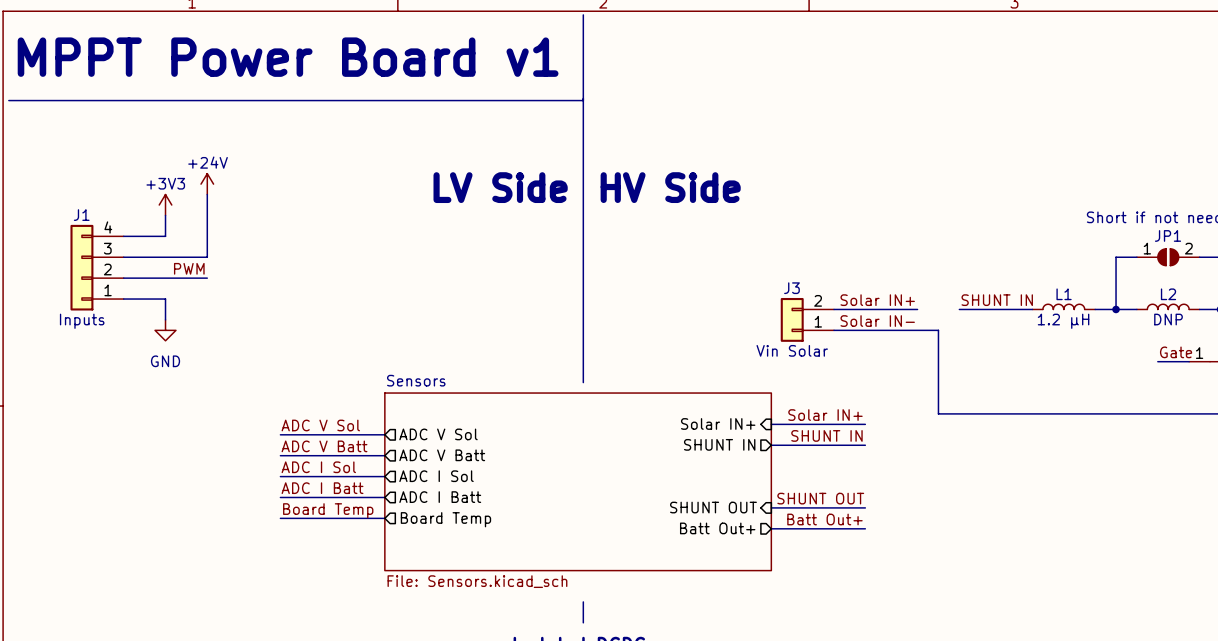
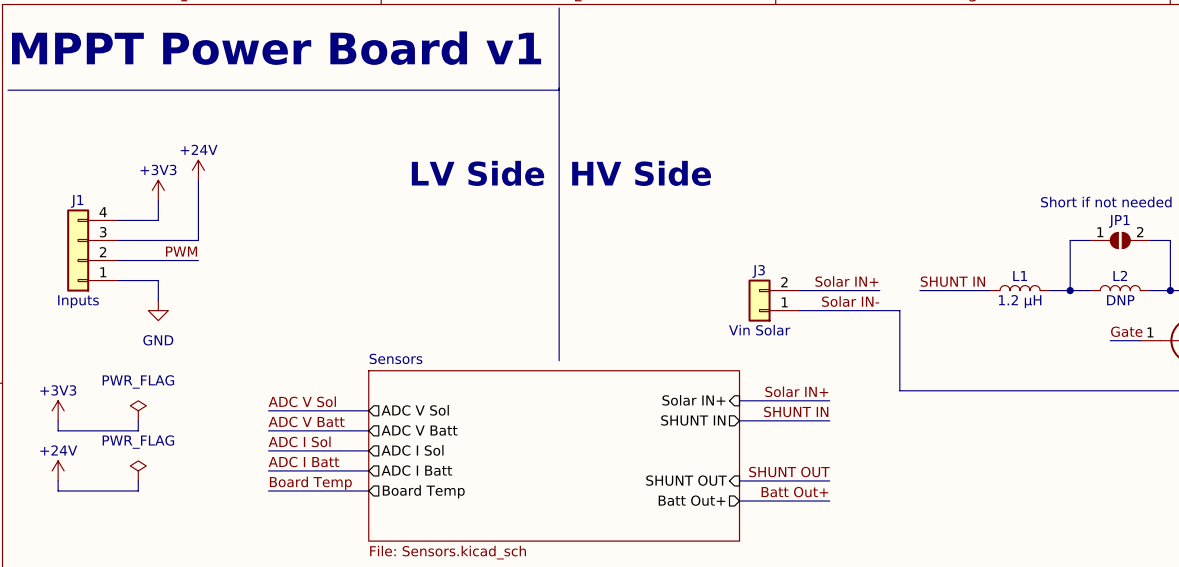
power symbol: none -> +3V3 (58, 410)
power symbol: none -> PWR_FLAG (138, 410)
wire: none -> (58, 420) (58, 430) (138, 430) (138, 420)
power symbol: none -> +24V (58, 470)
power symbol: none -> PWR_FLAG (138, 470)
wire: none -> (58, 480) (58, 490) (138, 490) (138, 480)

